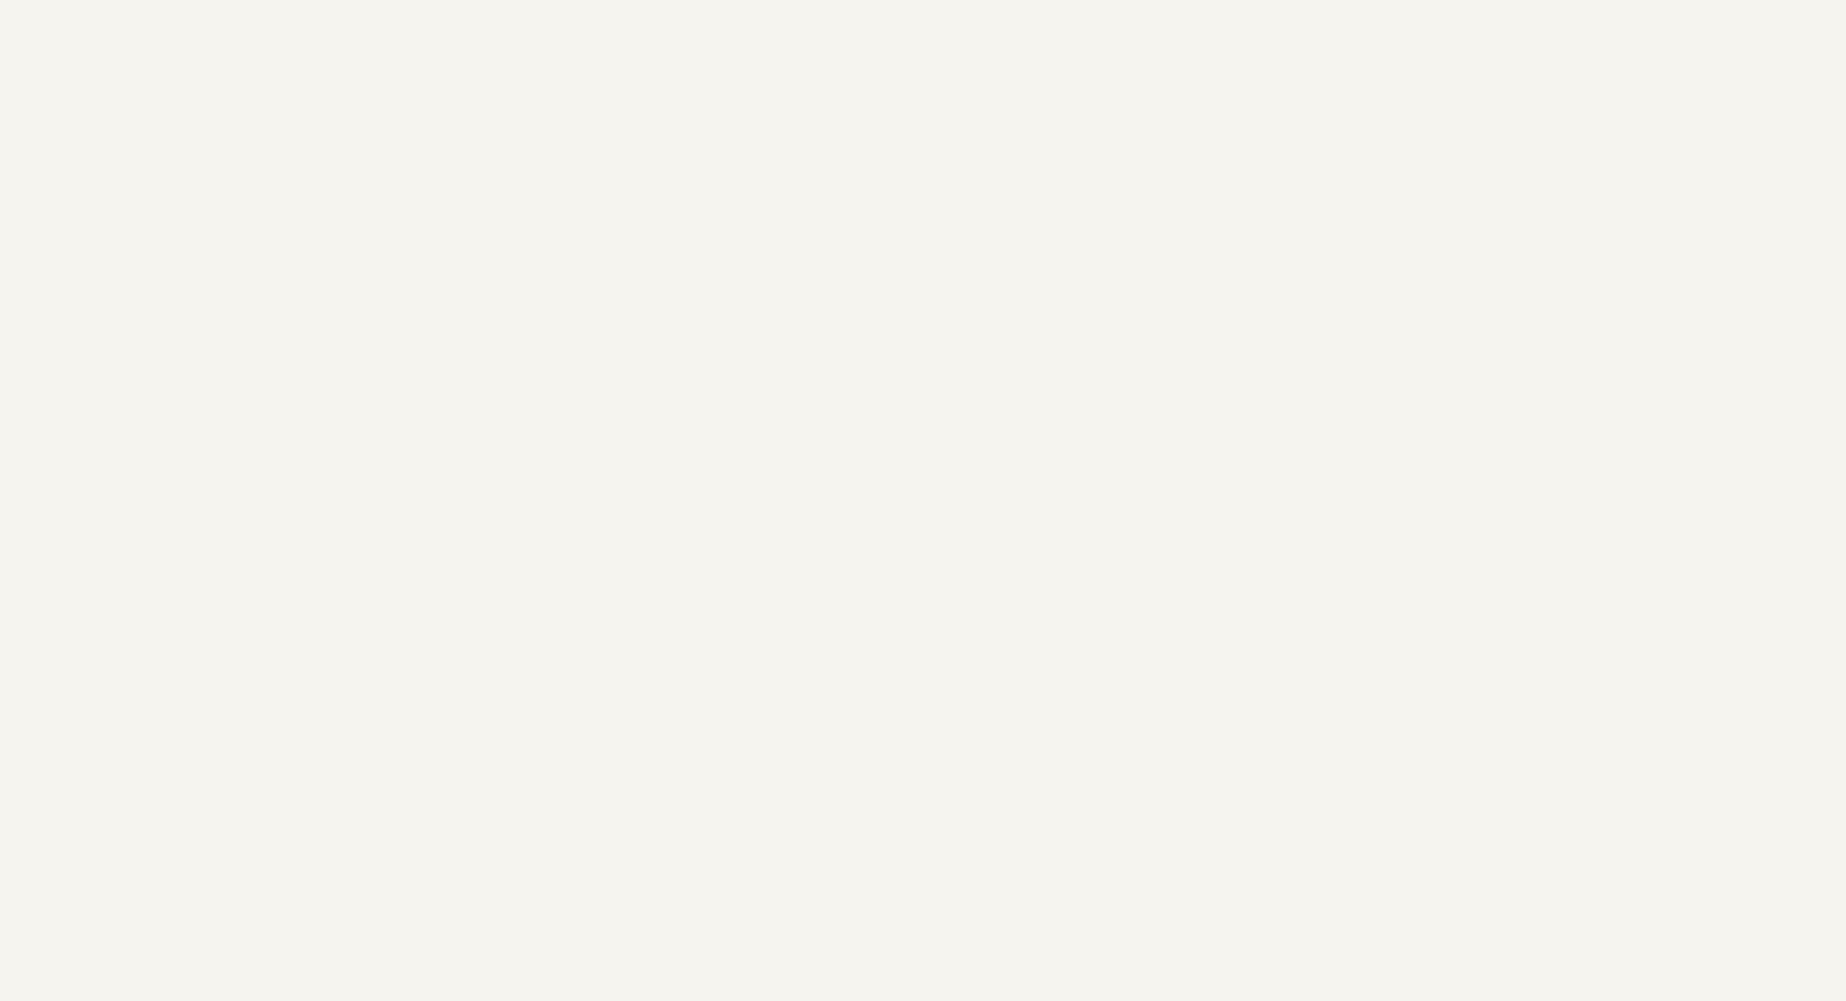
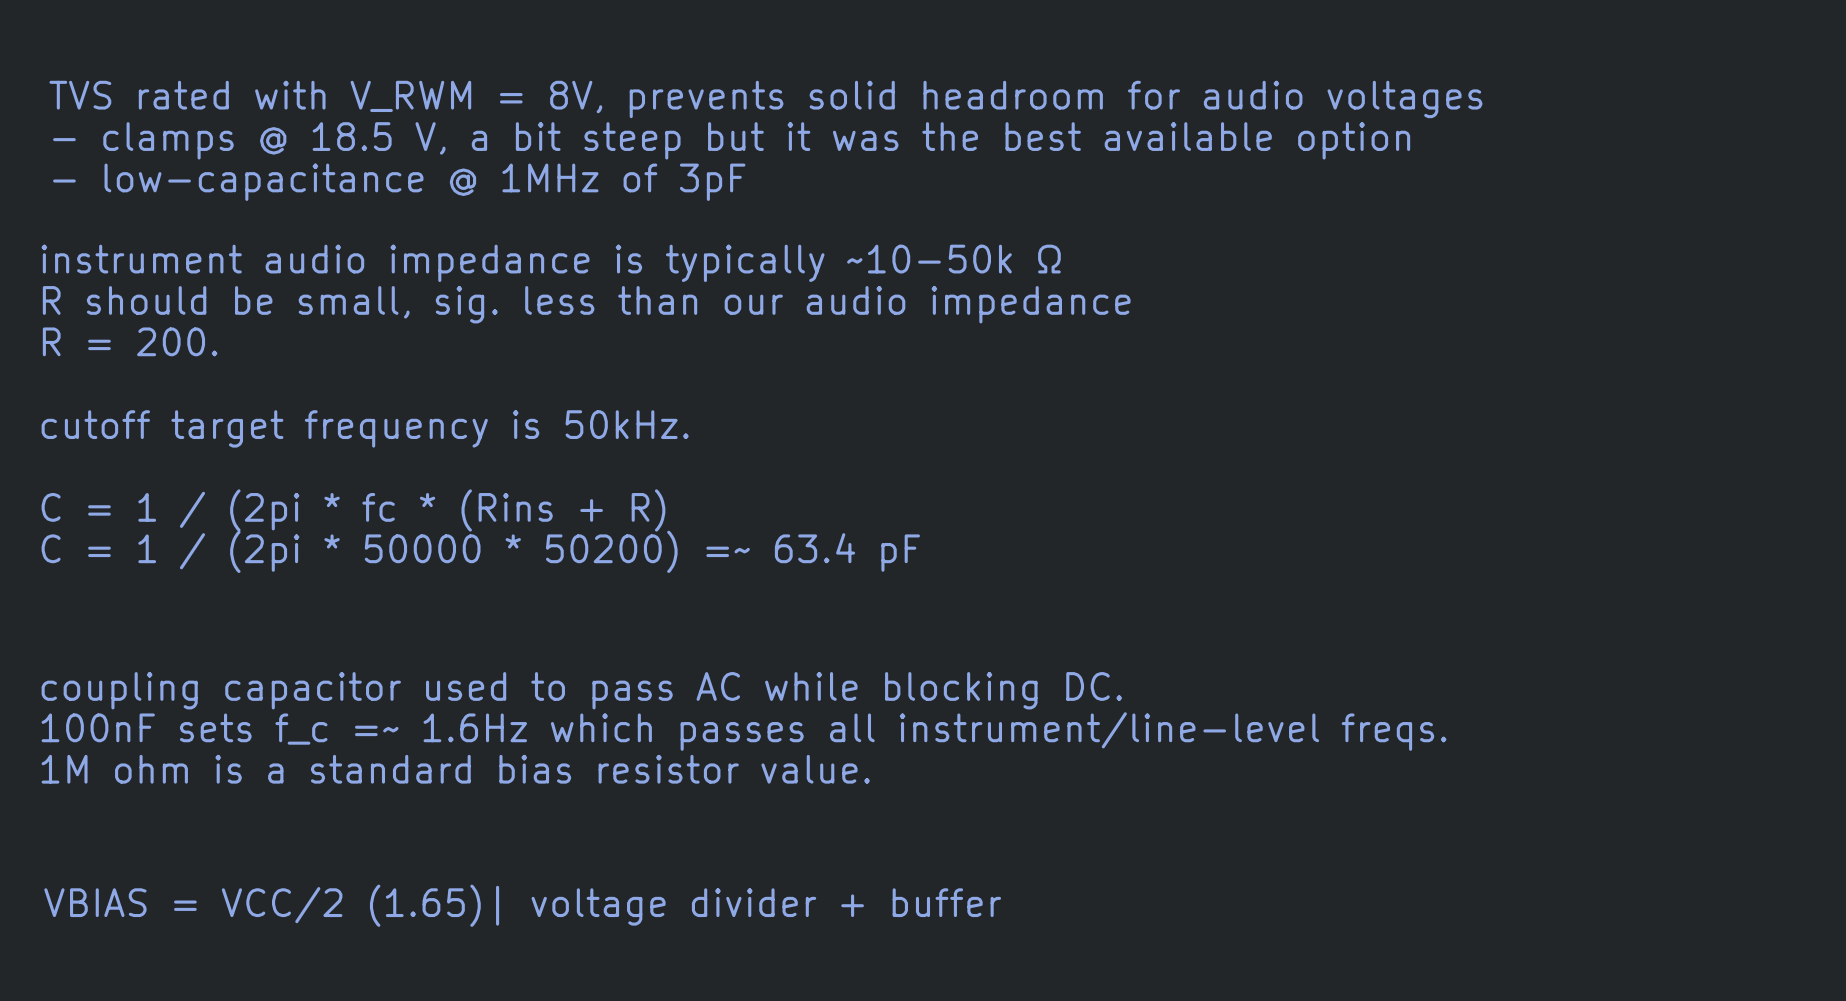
text: none -> TVS rated with V_RWM = 8V, prevents solid headroom for audio voltages (765, 99)
text: none -> - clamps @ 18.5 V, a bit steep but it was the best available option (731, 140)
text: none -> - low-capacitance @ 1MHz of 3pF (399, 182)
text: none -> instrument audio impedance is typically ~10-50k Ω (551, 263)
text: none -> R should be small, sig. less than our audio impedance (586, 304)
text: none -> R = 200. (130, 341)
text: none -> cutoff target frequency is 50kHz. (365, 428)
text: none -> C = 1 / (2pi * fc * (Rins + R) (353, 510)
text: none -> C = 1 / (2pi * 50000 * 50200) =~ 63.4 pF (480, 551)
text: none -> coupling capacitor used to pass AC while blocking DC. (581, 690)
text: none -> 100nF sets f_c =~ 1.6Hz which passes all instrument/line-level freqs. (744, 731)
text: none -> 1M ohm is a standard bias resistor value. (455, 769)
text: none -> VBIAS = VCC/2 (1.65)| voltage divider + buffer (522, 905)

